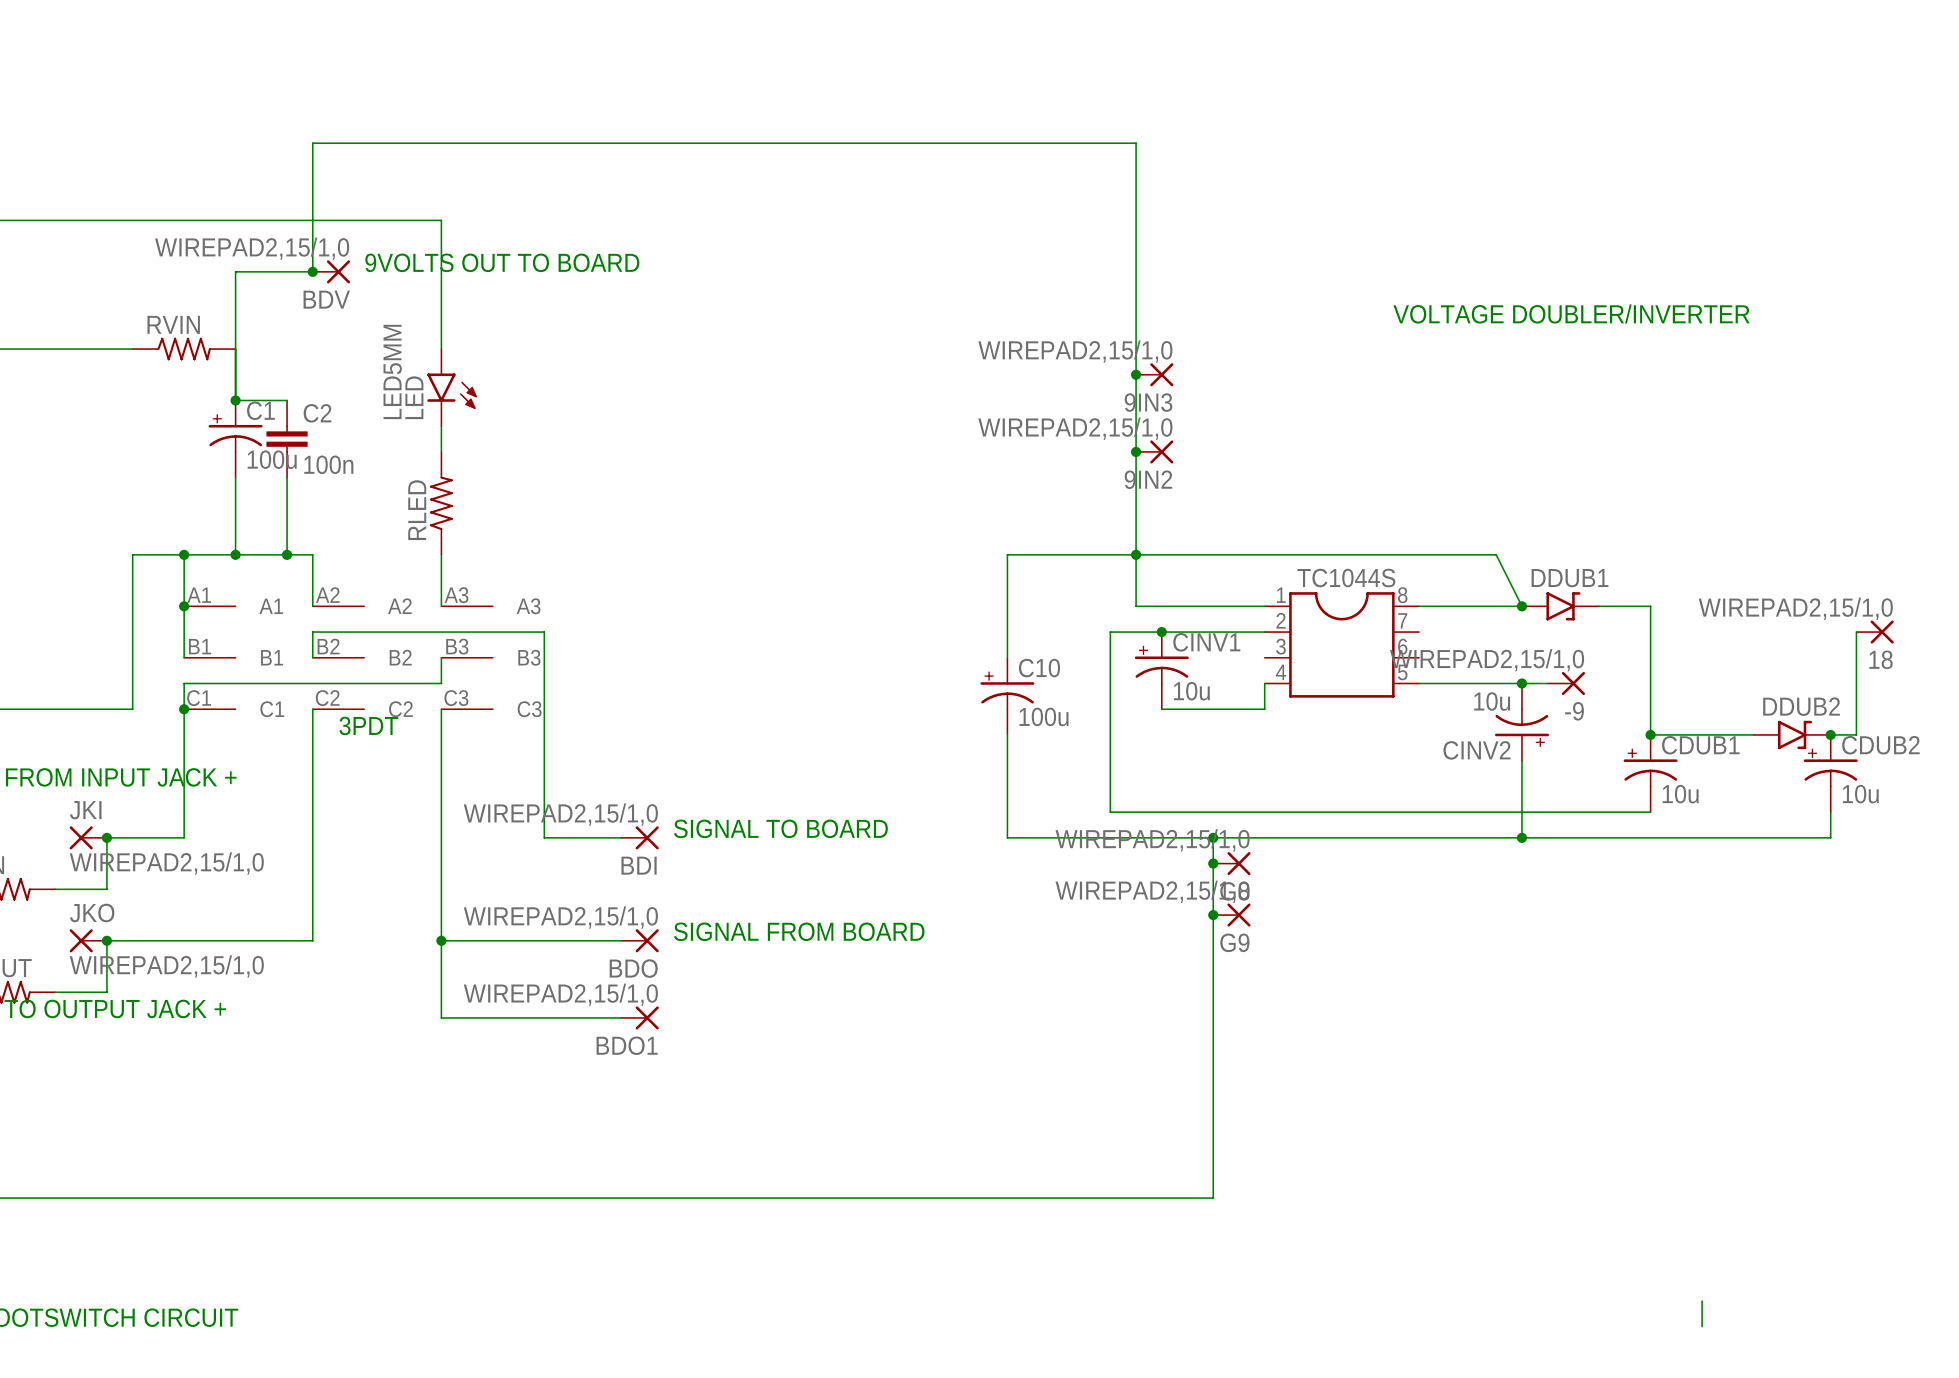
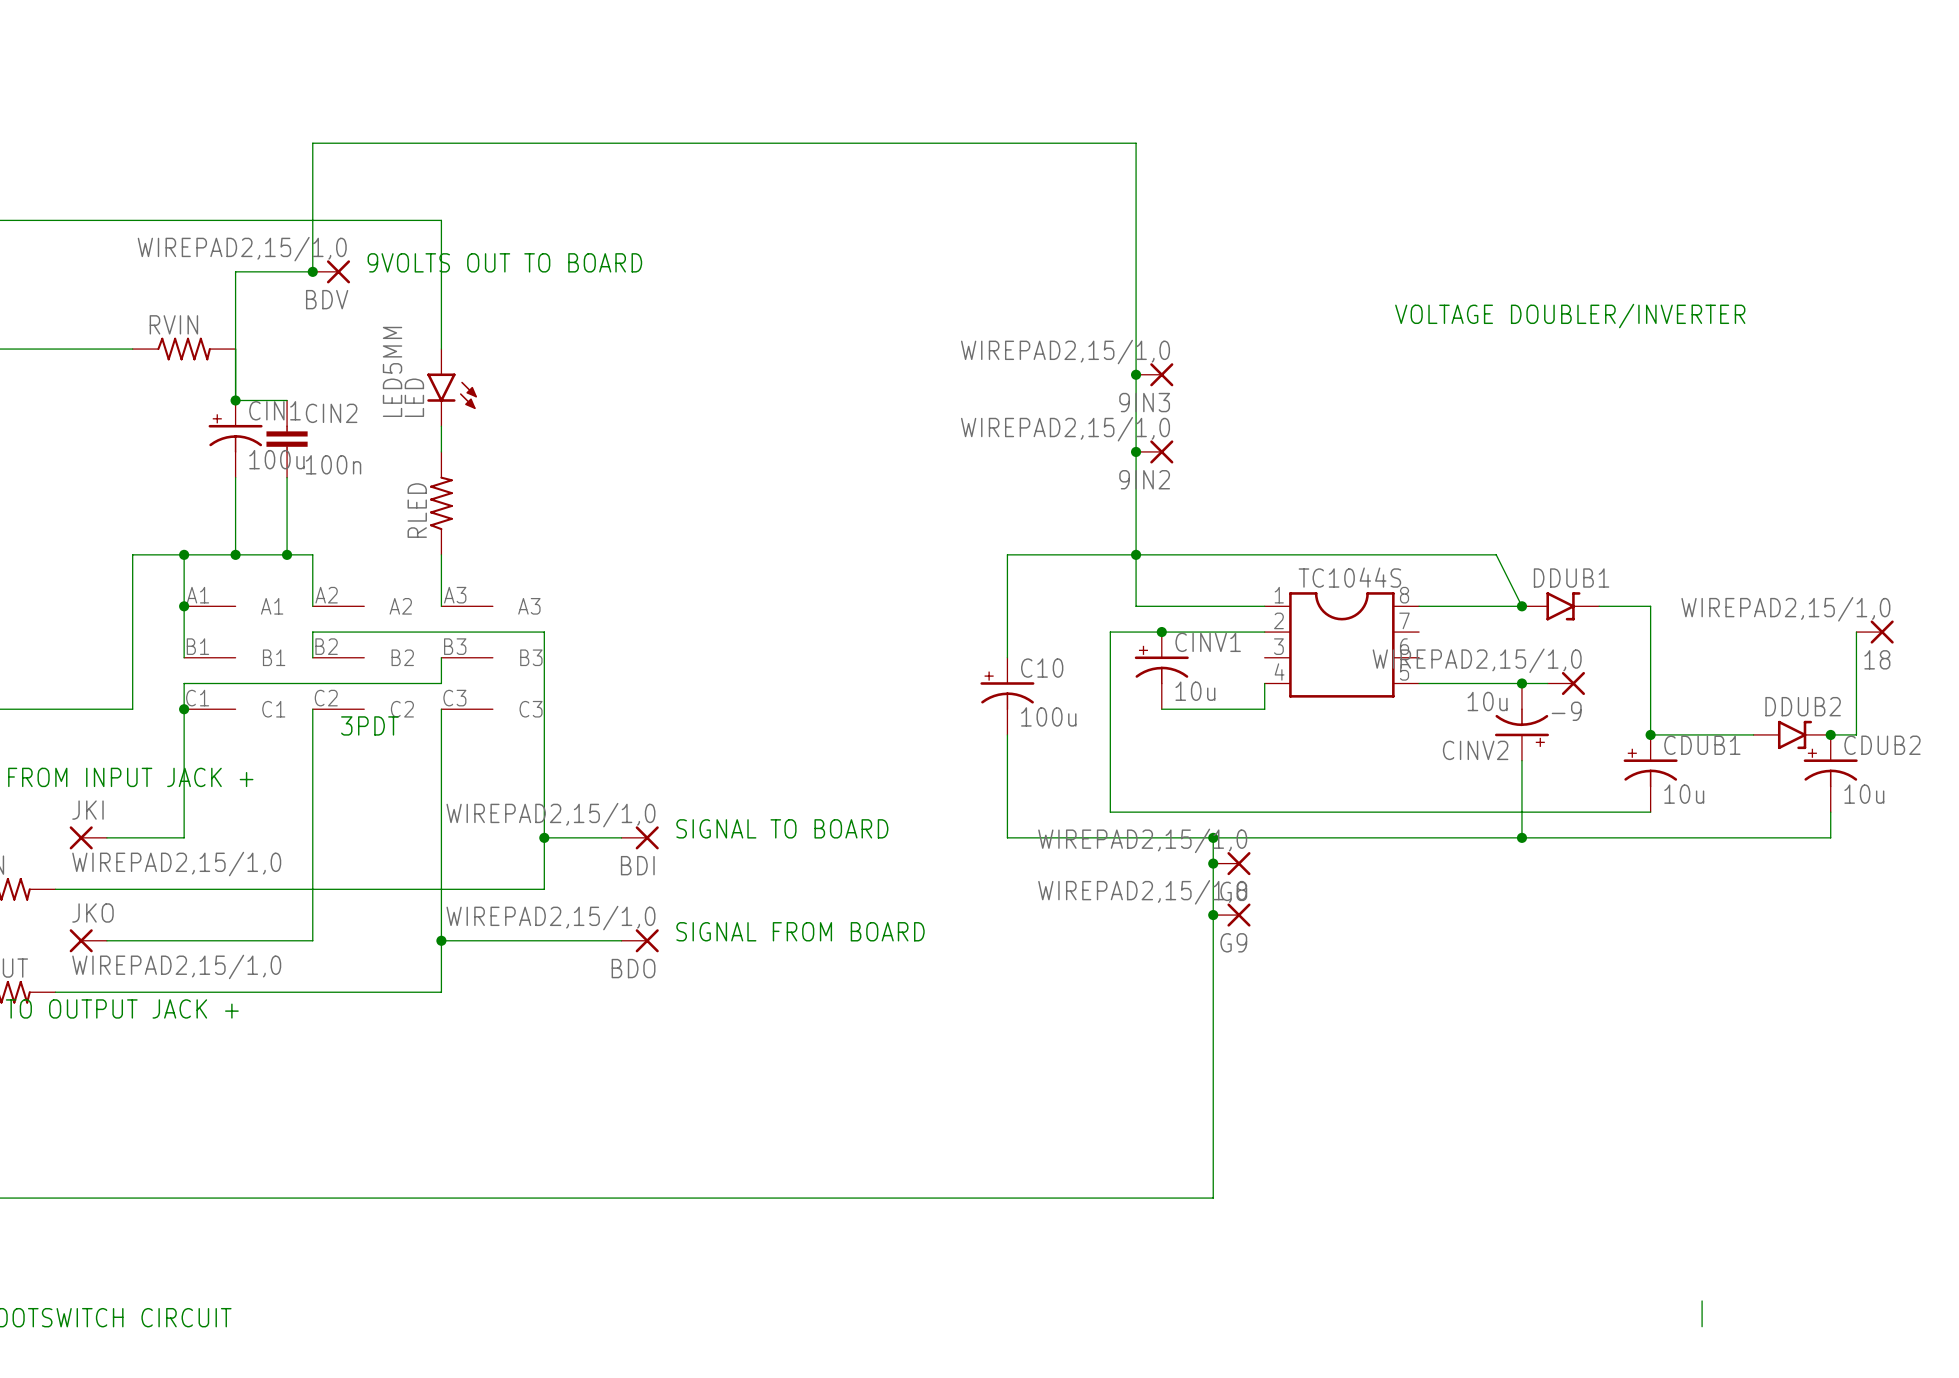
C1 name: C1 (260, 410) -> CIN1 (275, 410)
C2 name: C2 (317, 413) -> CIN2 (331, 413)
wire: (106, 837) (106, 889) -> (544, 837) (544, 889) (106, 889)
junction: (106, 837) -> none
junction: none -> (544, 837)
wire: (106, 940) (106, 992) -> (441, 992) (106, 992)
junction: (106, 940) -> none
wire: (441, 992) (441, 1017) (621, 1017) -> none
BDO1: WIREPAD2,15/1,0 (640, 1017) -> none

